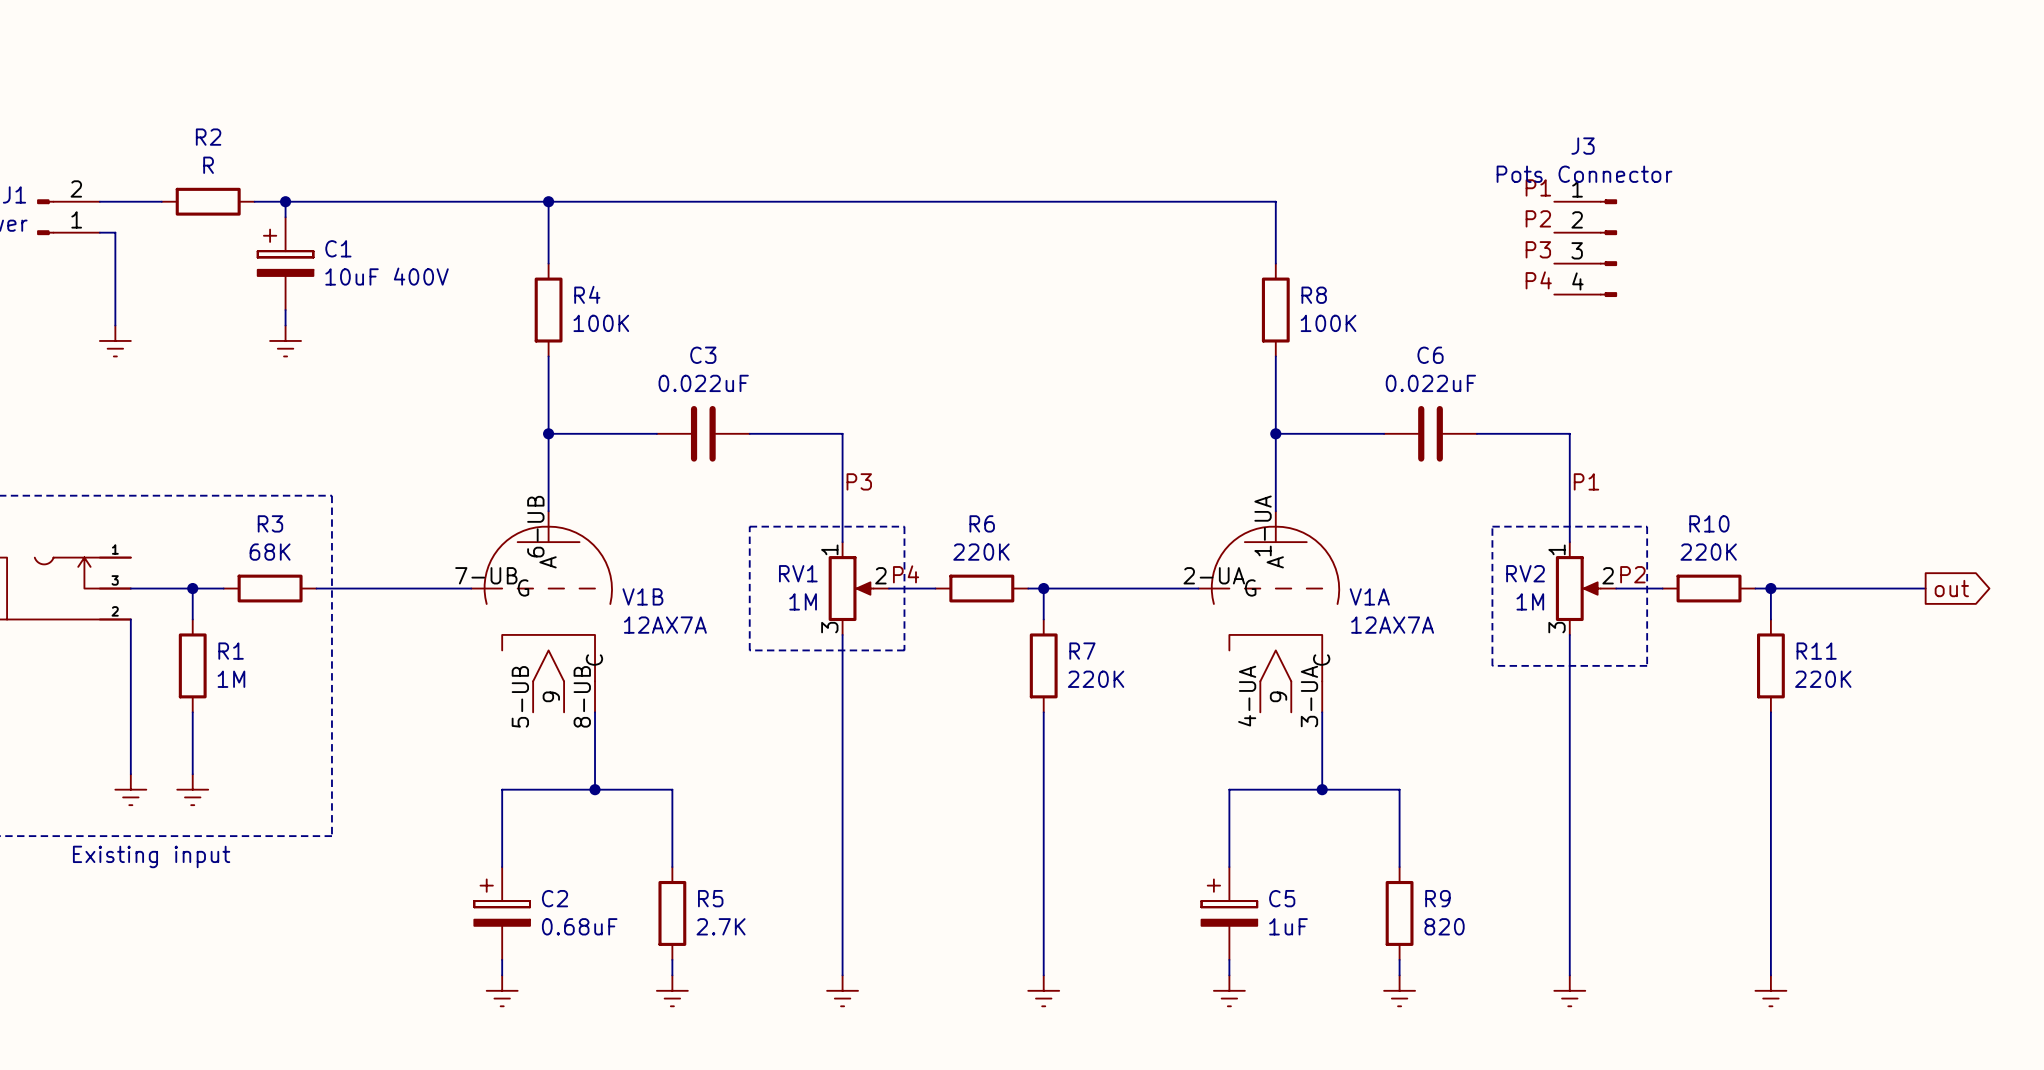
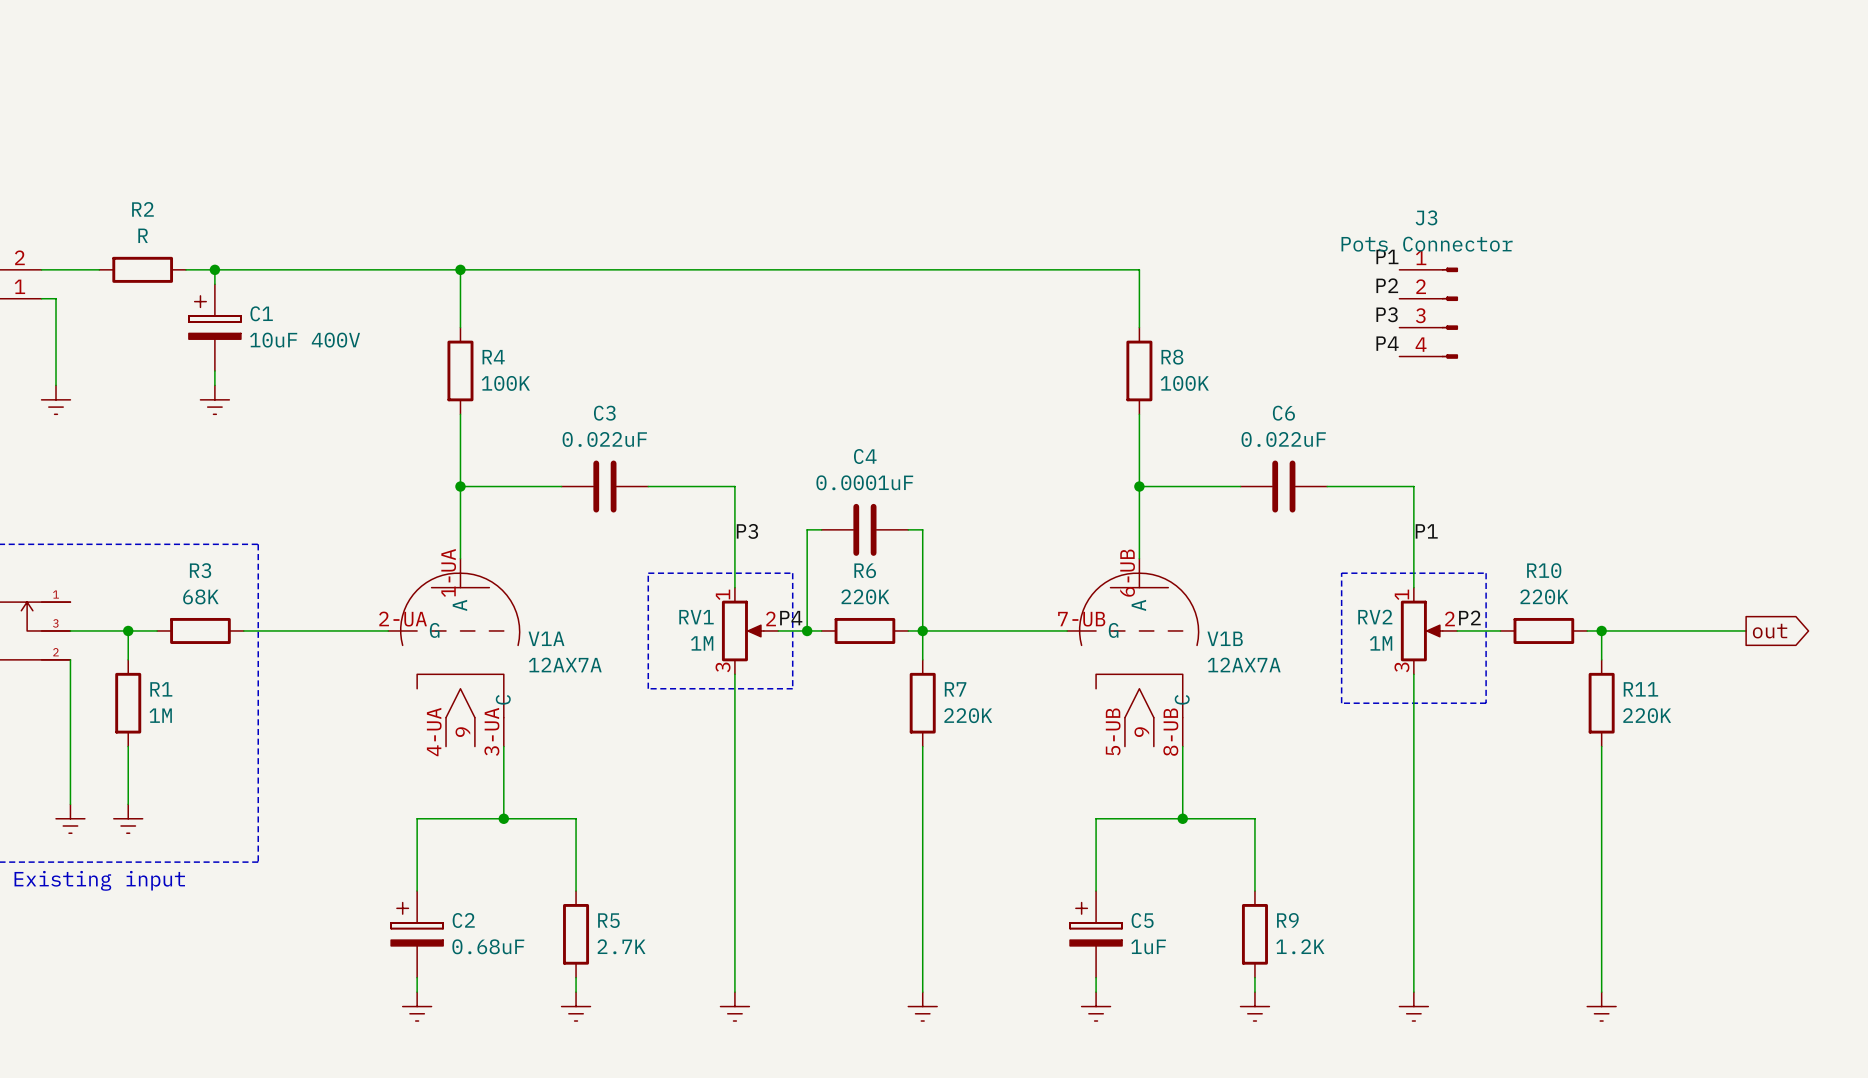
wire: none -> (821, 529) (807, 529) (807, 630)
C4: none -> 0.0001uF (864, 529)
wire: none -> (908, 529) (922, 529) (922, 630)
junction: none -> (807, 630)
V1B position: (541, 611) -> (1132, 652)
V1A position: (1268, 611) -> (453, 652)
R9 value: 820 (1444, 926) -> 1.2K (1300, 946)

